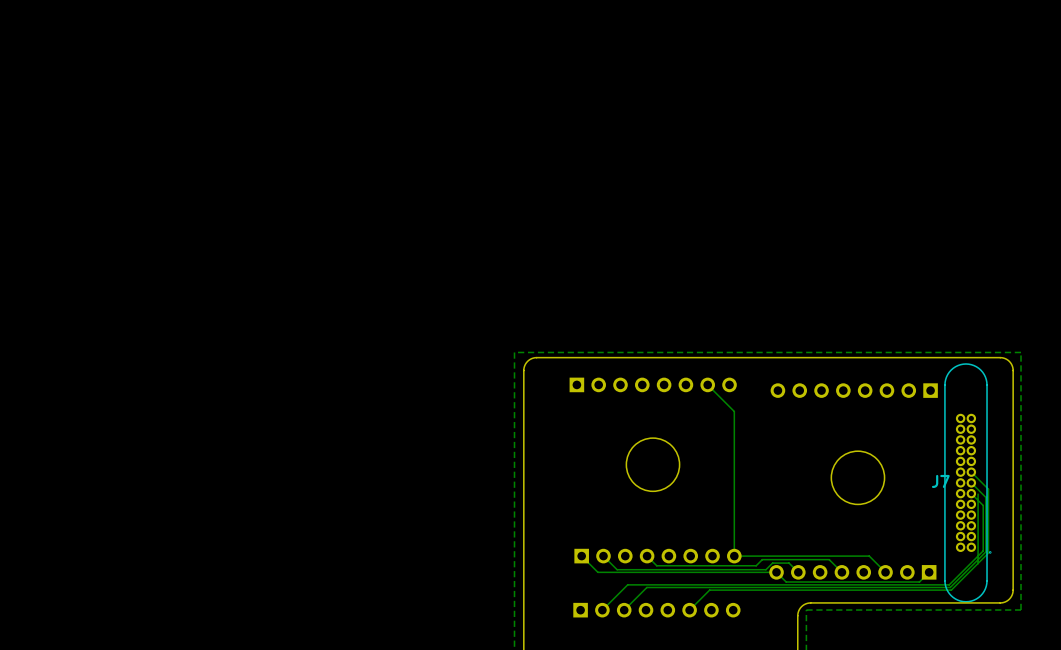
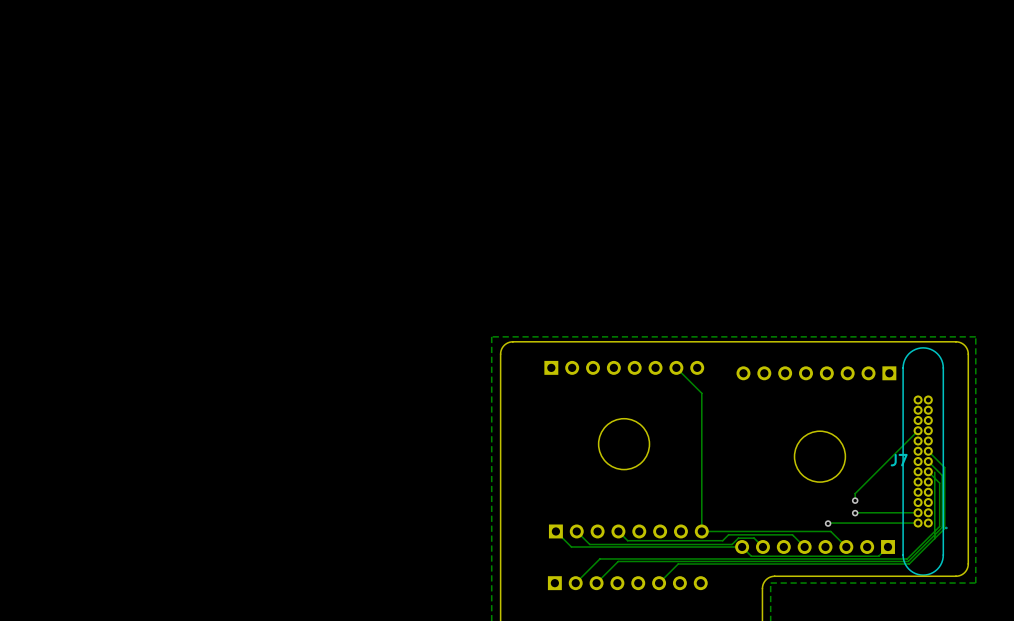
track: none -> (918, 430) (855, 493) (855, 500)
via: none -> (855, 500)
via: none -> (855, 513)
track: none -> (918, 512) (855, 513)
via: none -> (828, 523)
track: none -> (918, 523) (828, 523)

